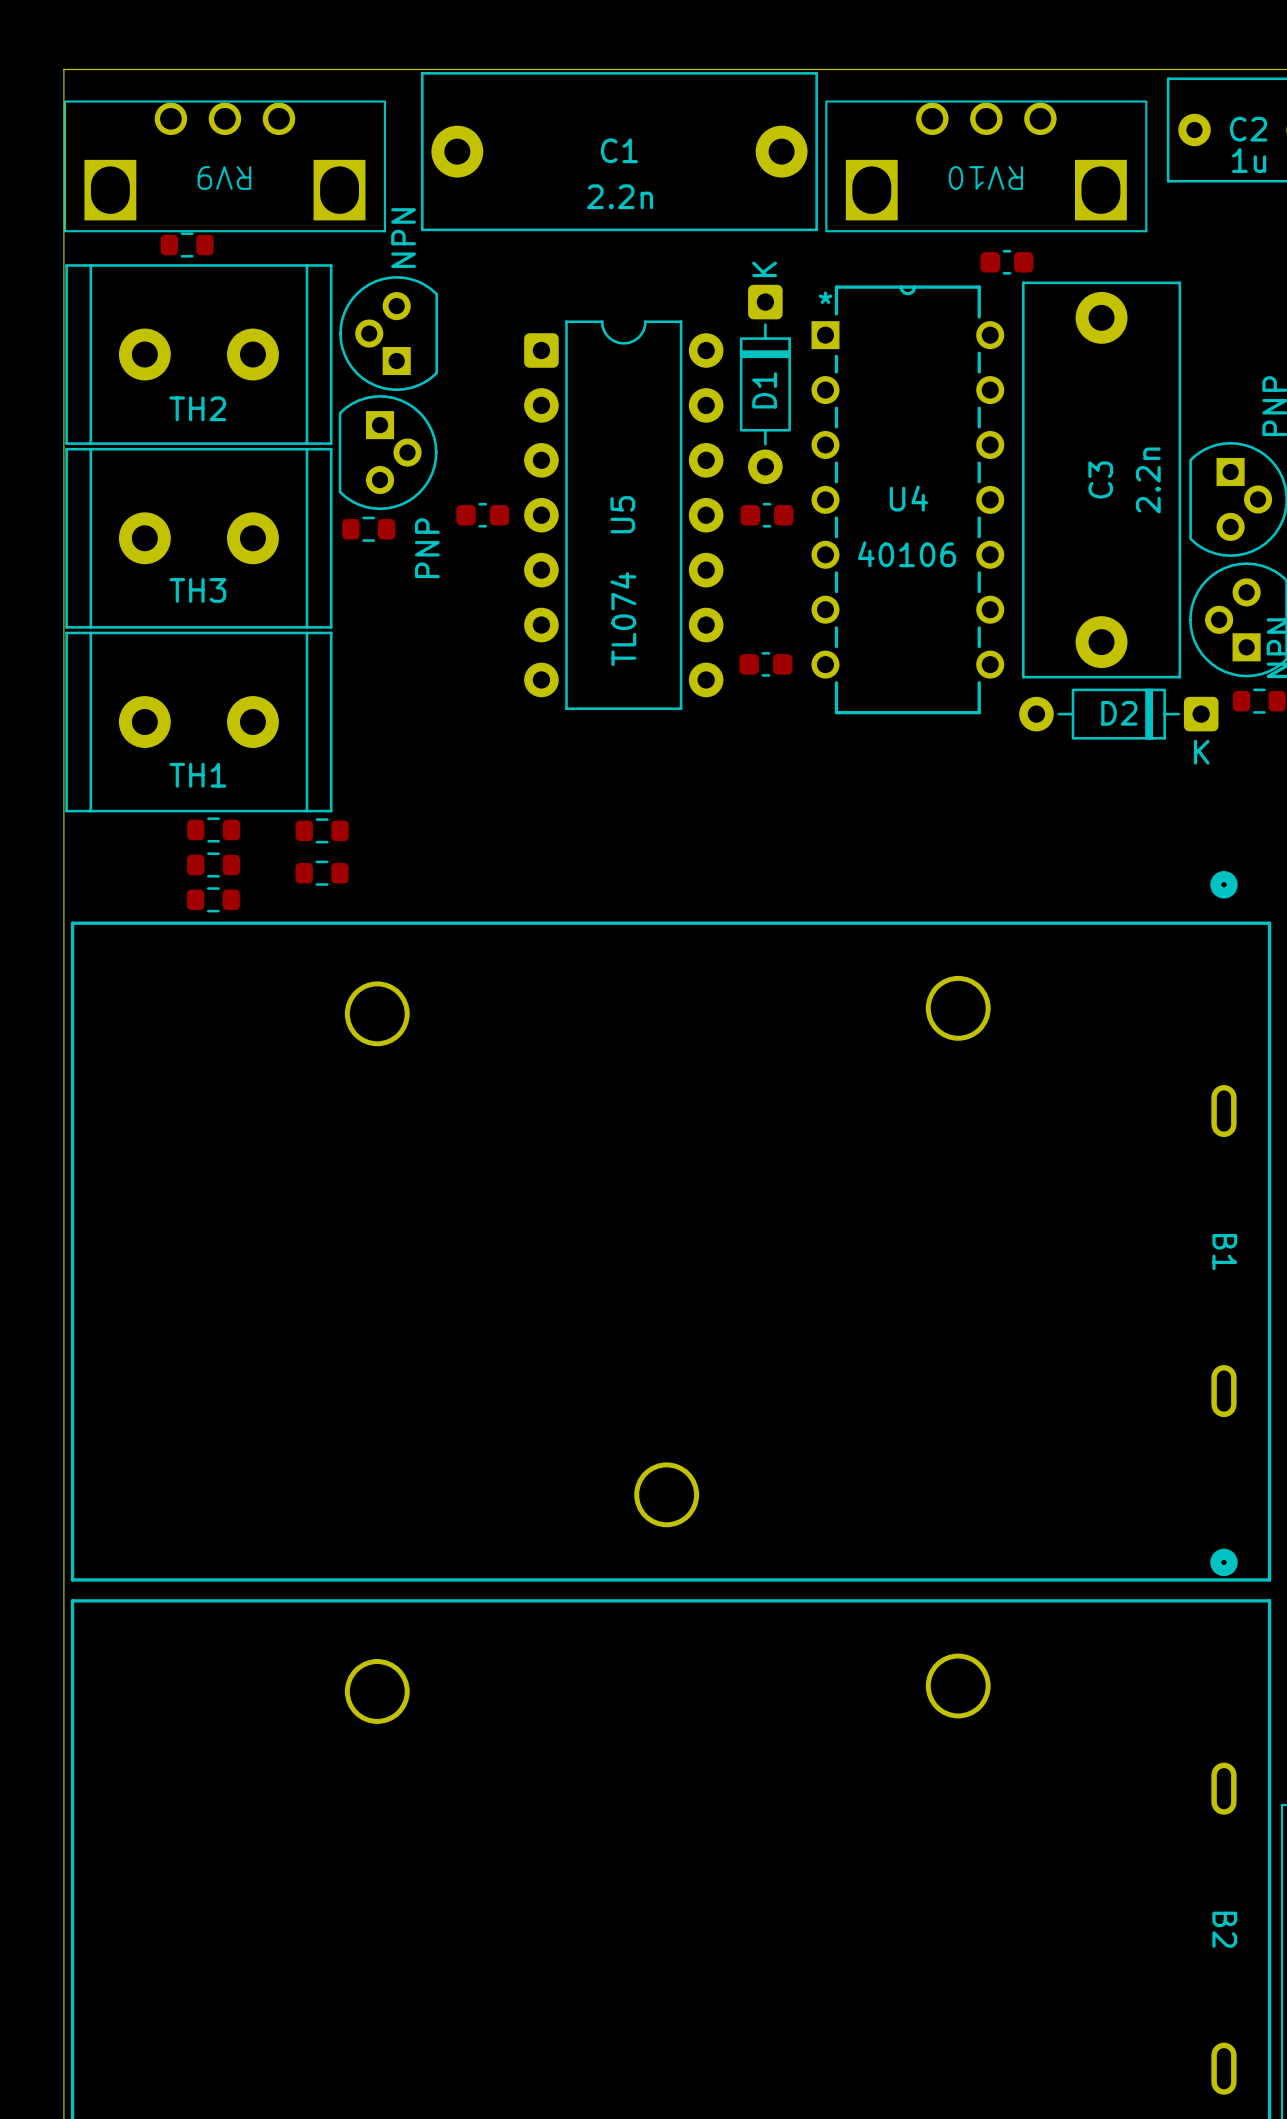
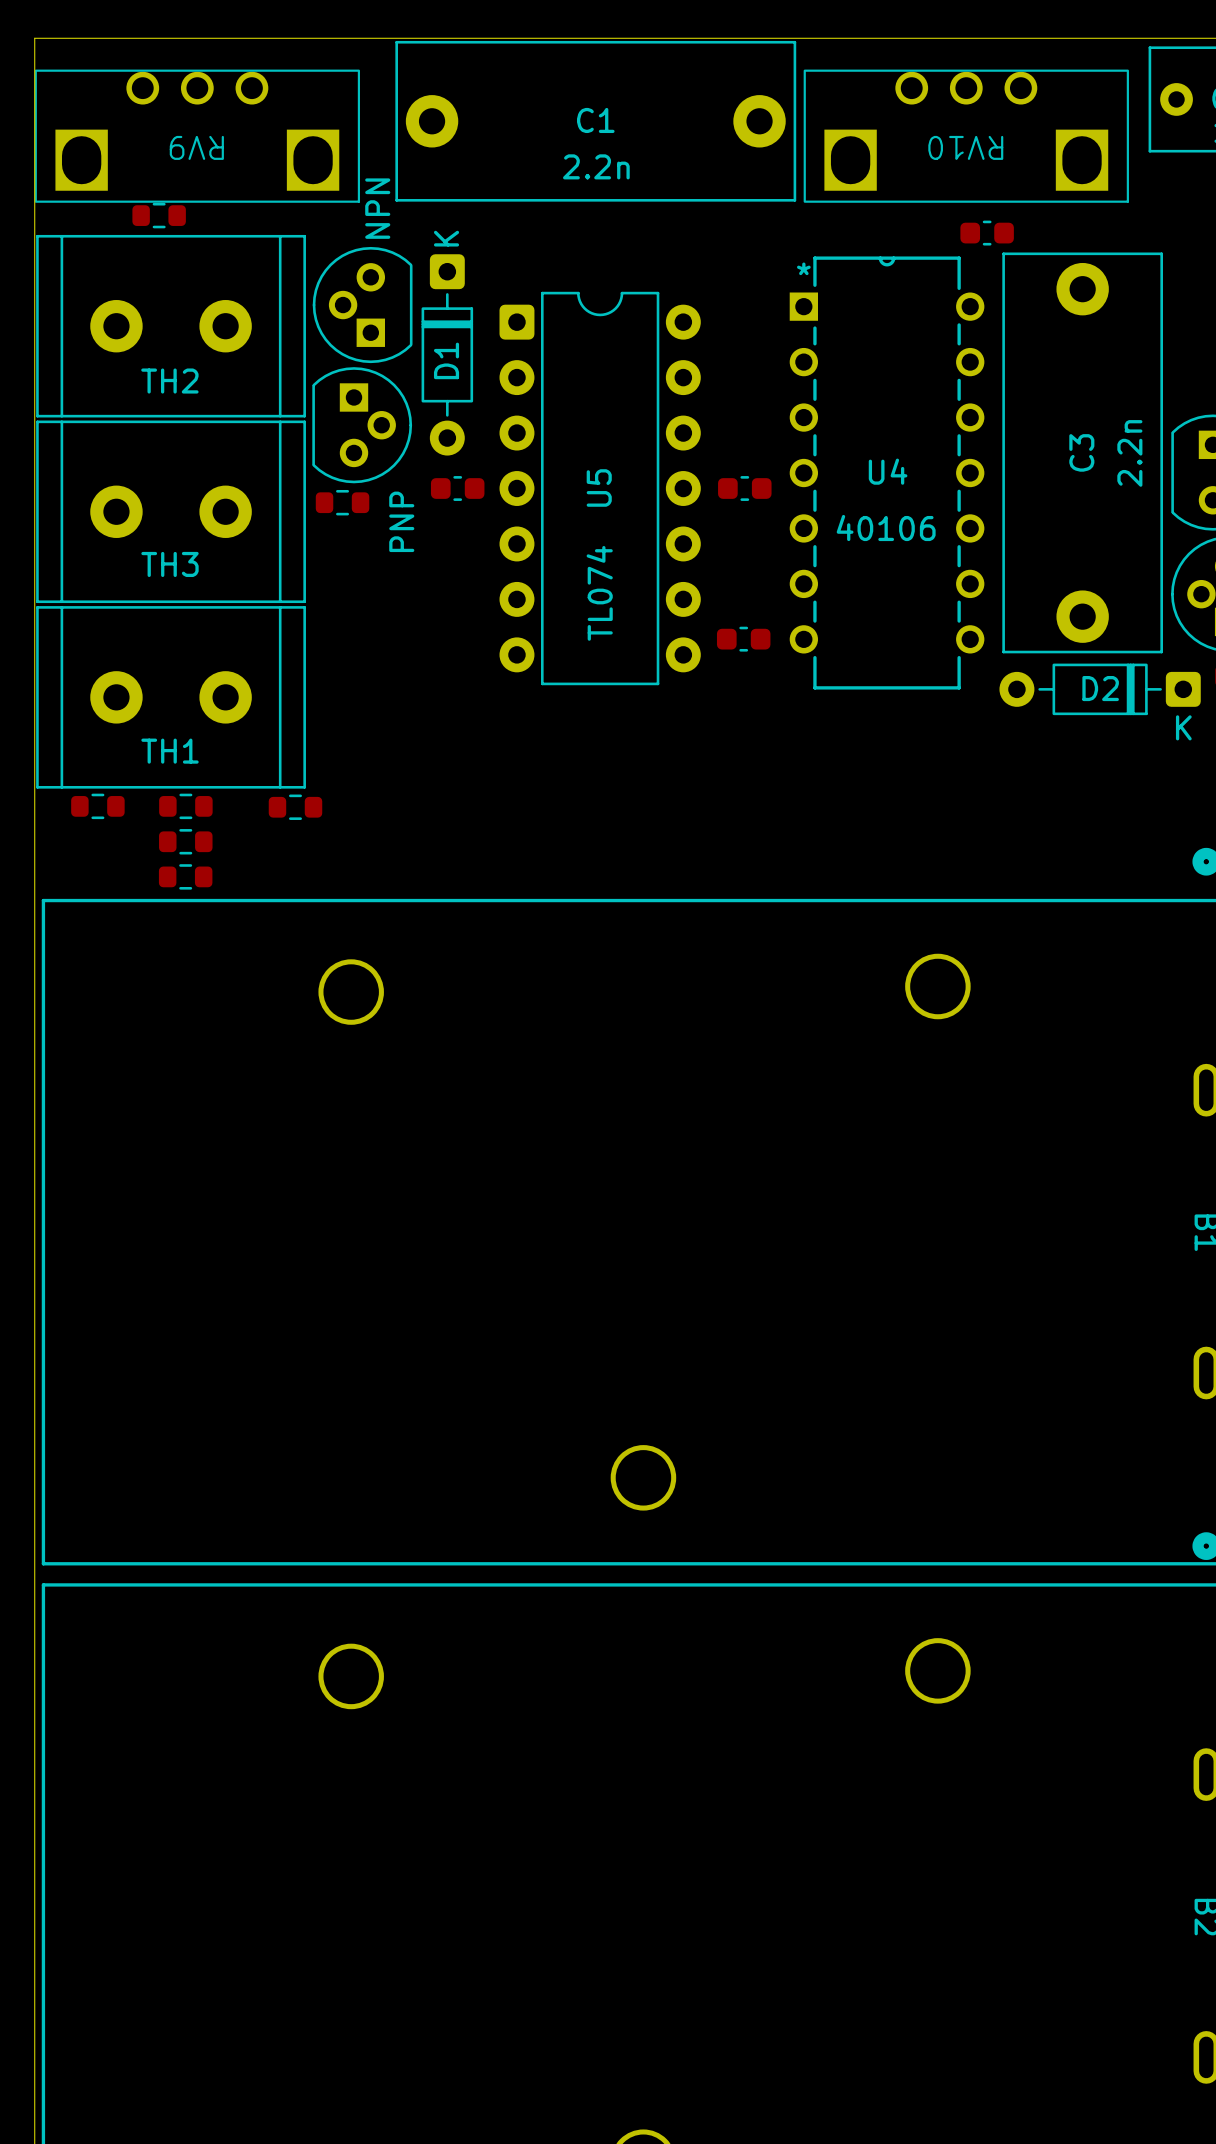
D1 position: (765, 384) -> (447, 354)
part position: (322, 873) -> (97, 806)

